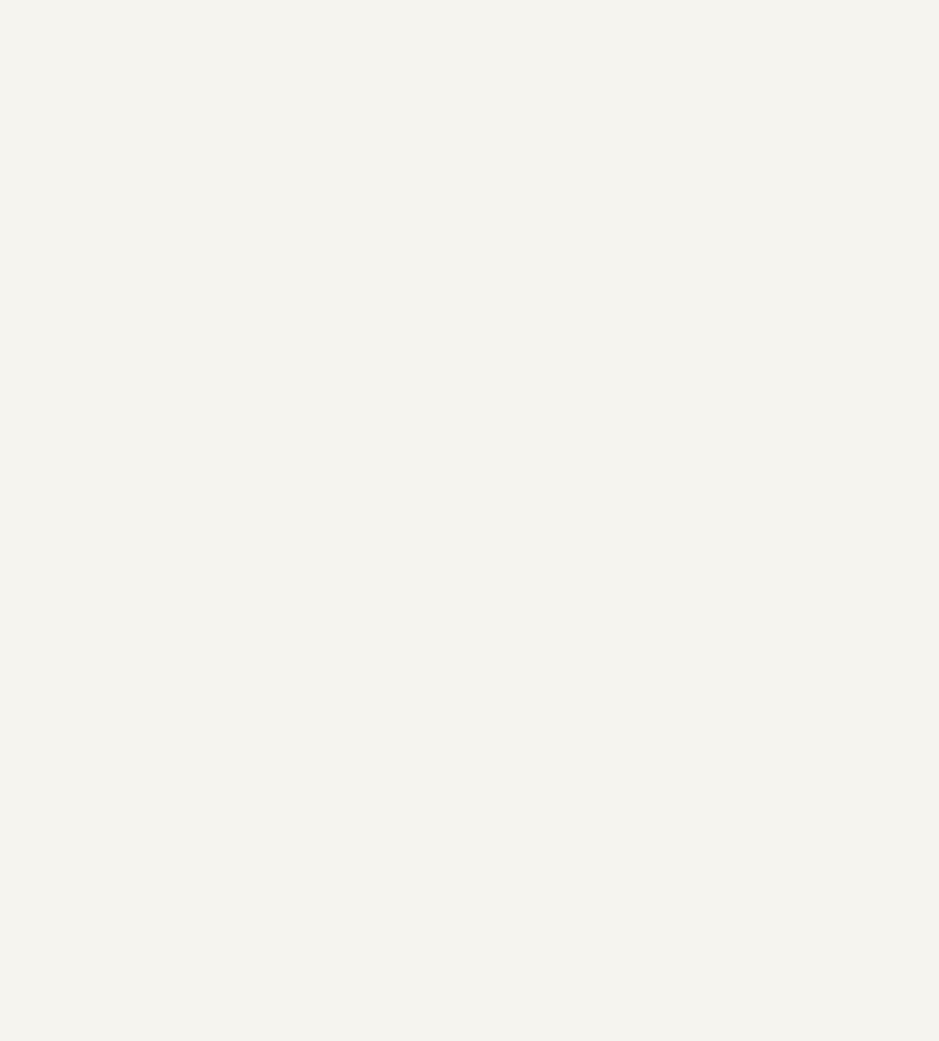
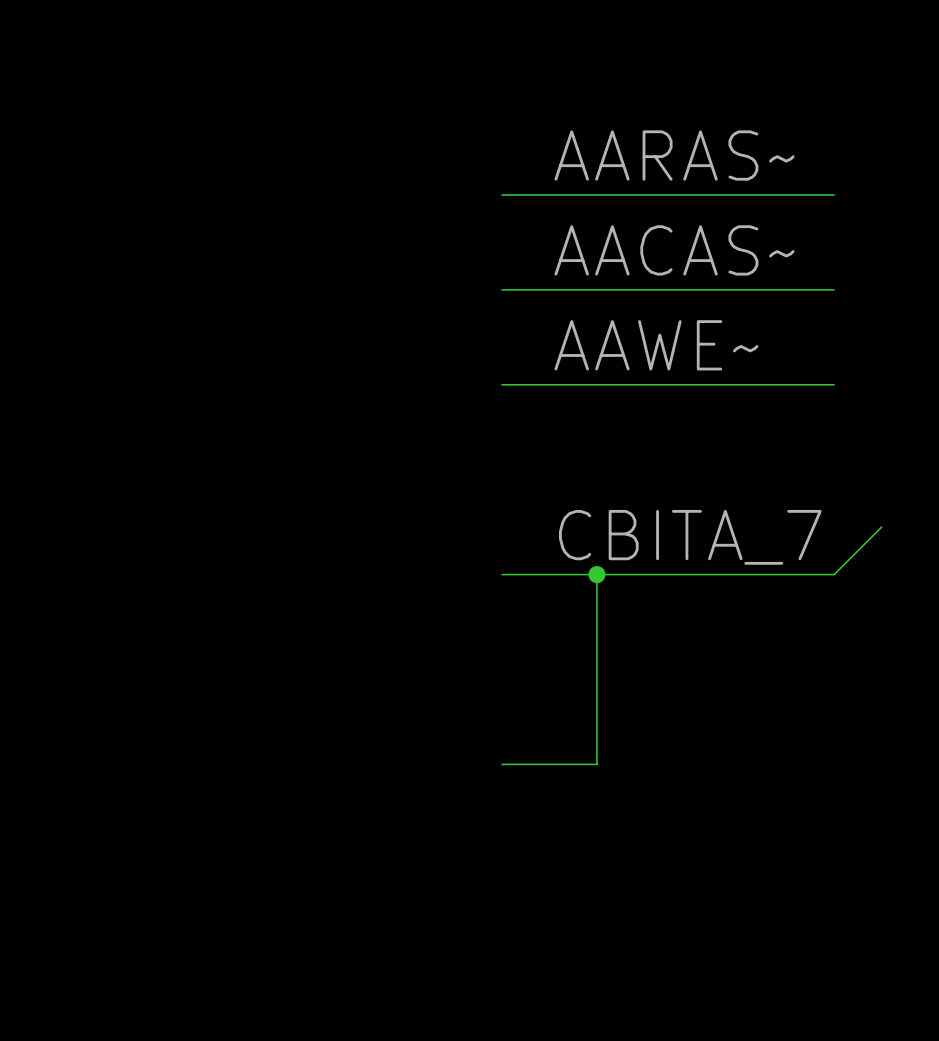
label: none -> AARAS~ (674, 155)
wire: none -> (502, 195) (834, 195)
label: none -> AACAS~ (674, 250)
wire: none -> (502, 289) (834, 289)
label: none -> AAWE~ (656, 345)
wire: none -> (502, 384) (834, 384)
wire: none -> (881, 527) (834, 574) (502, 574)
label: none -> CBITA_7 (690, 537)
wire: none -> (596, 574) (596, 764) (502, 764)
junction: none -> (596, 574)

